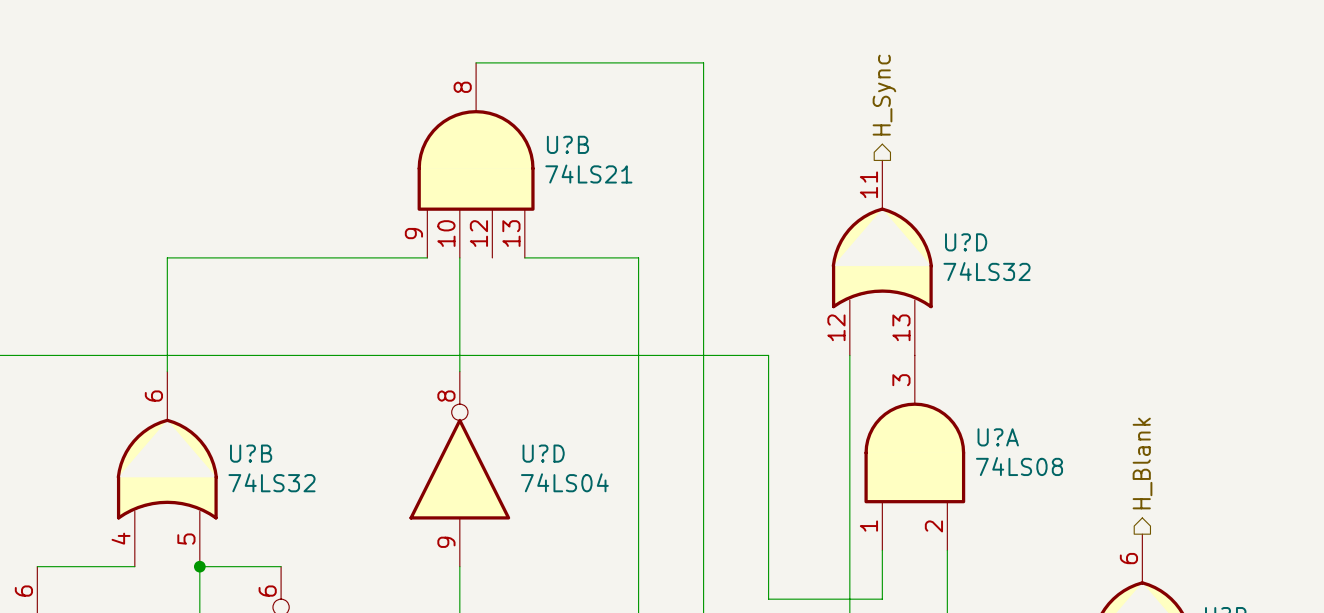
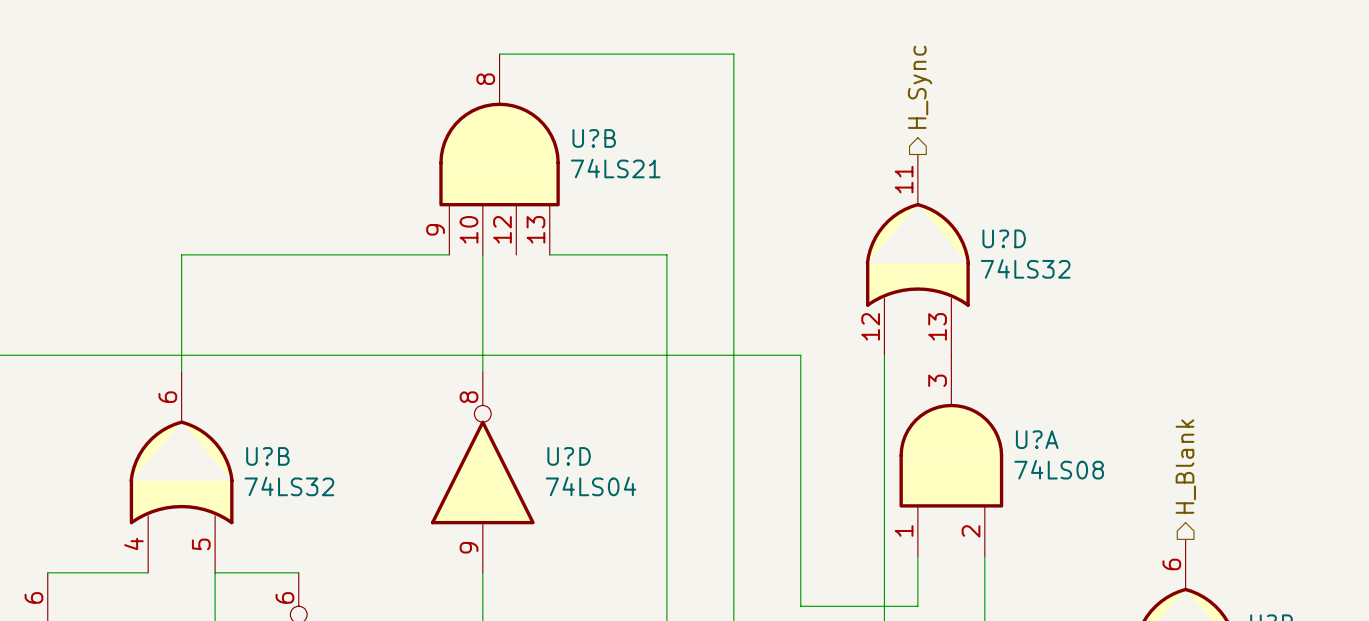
junction: (199, 566) -> none

